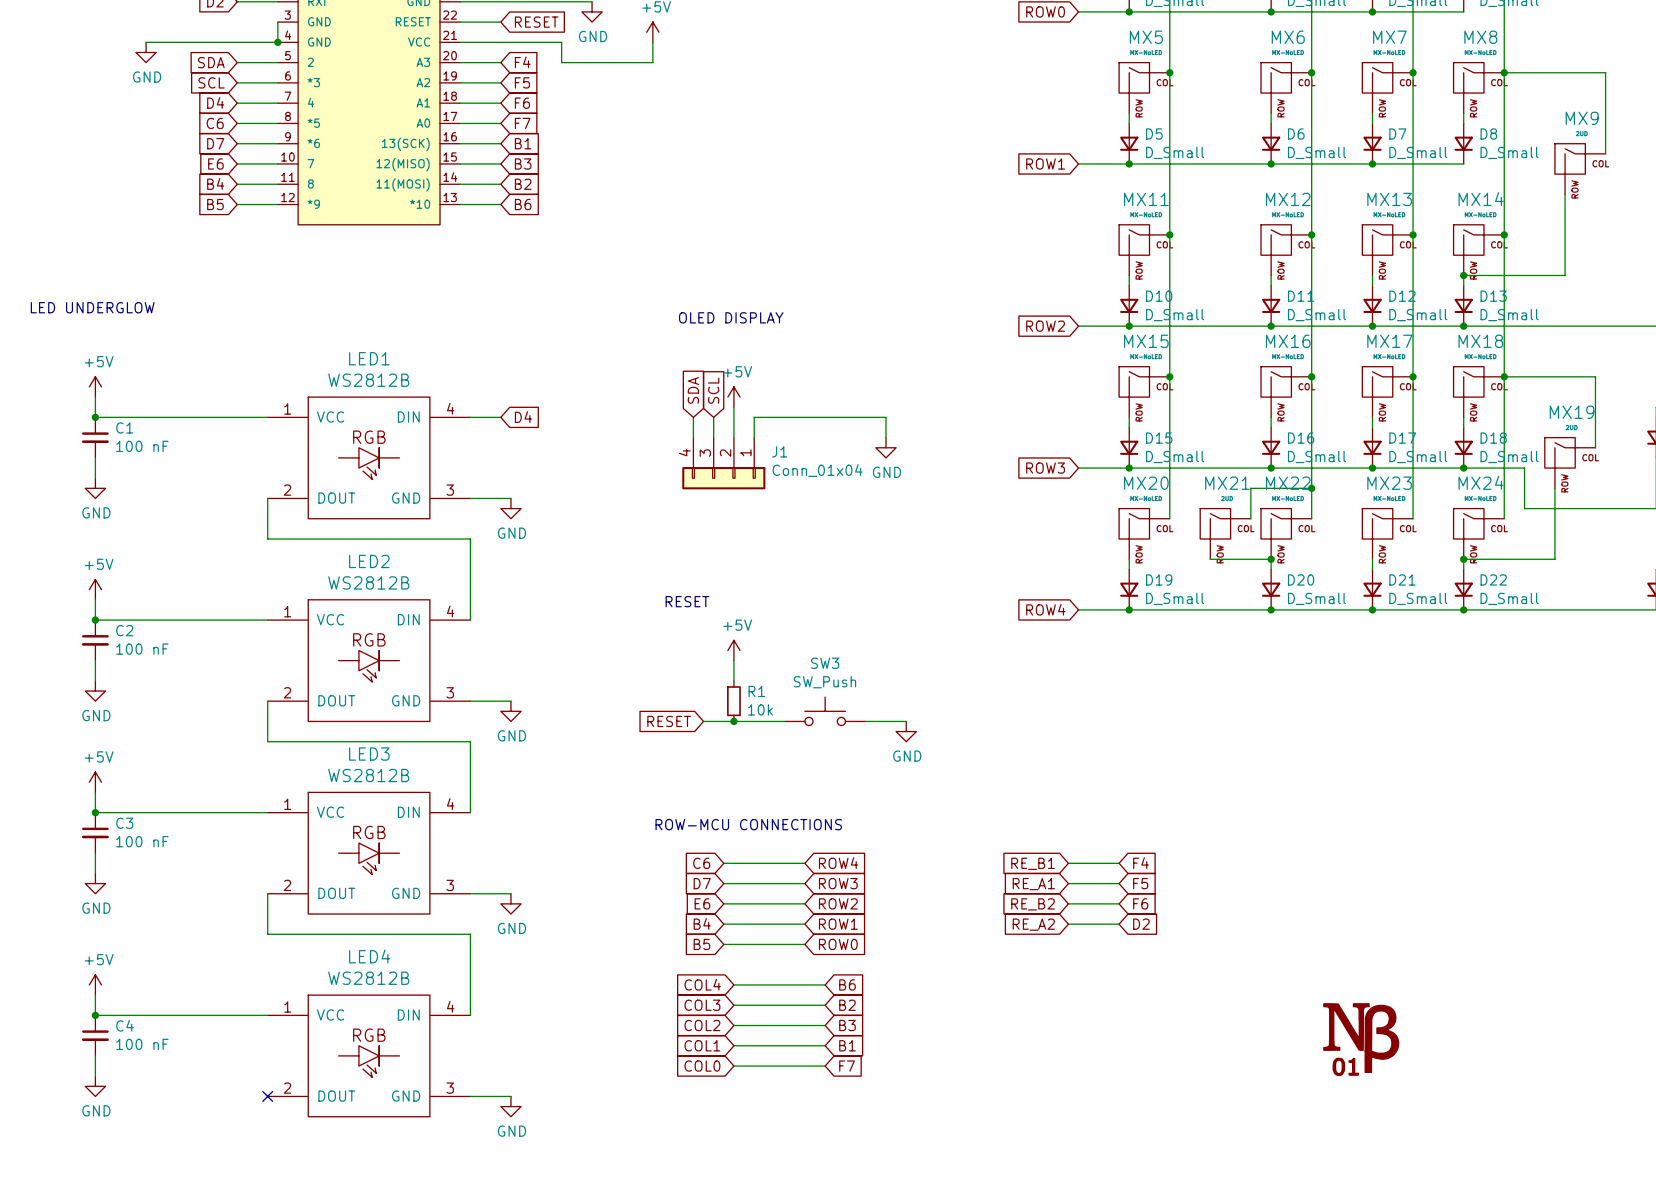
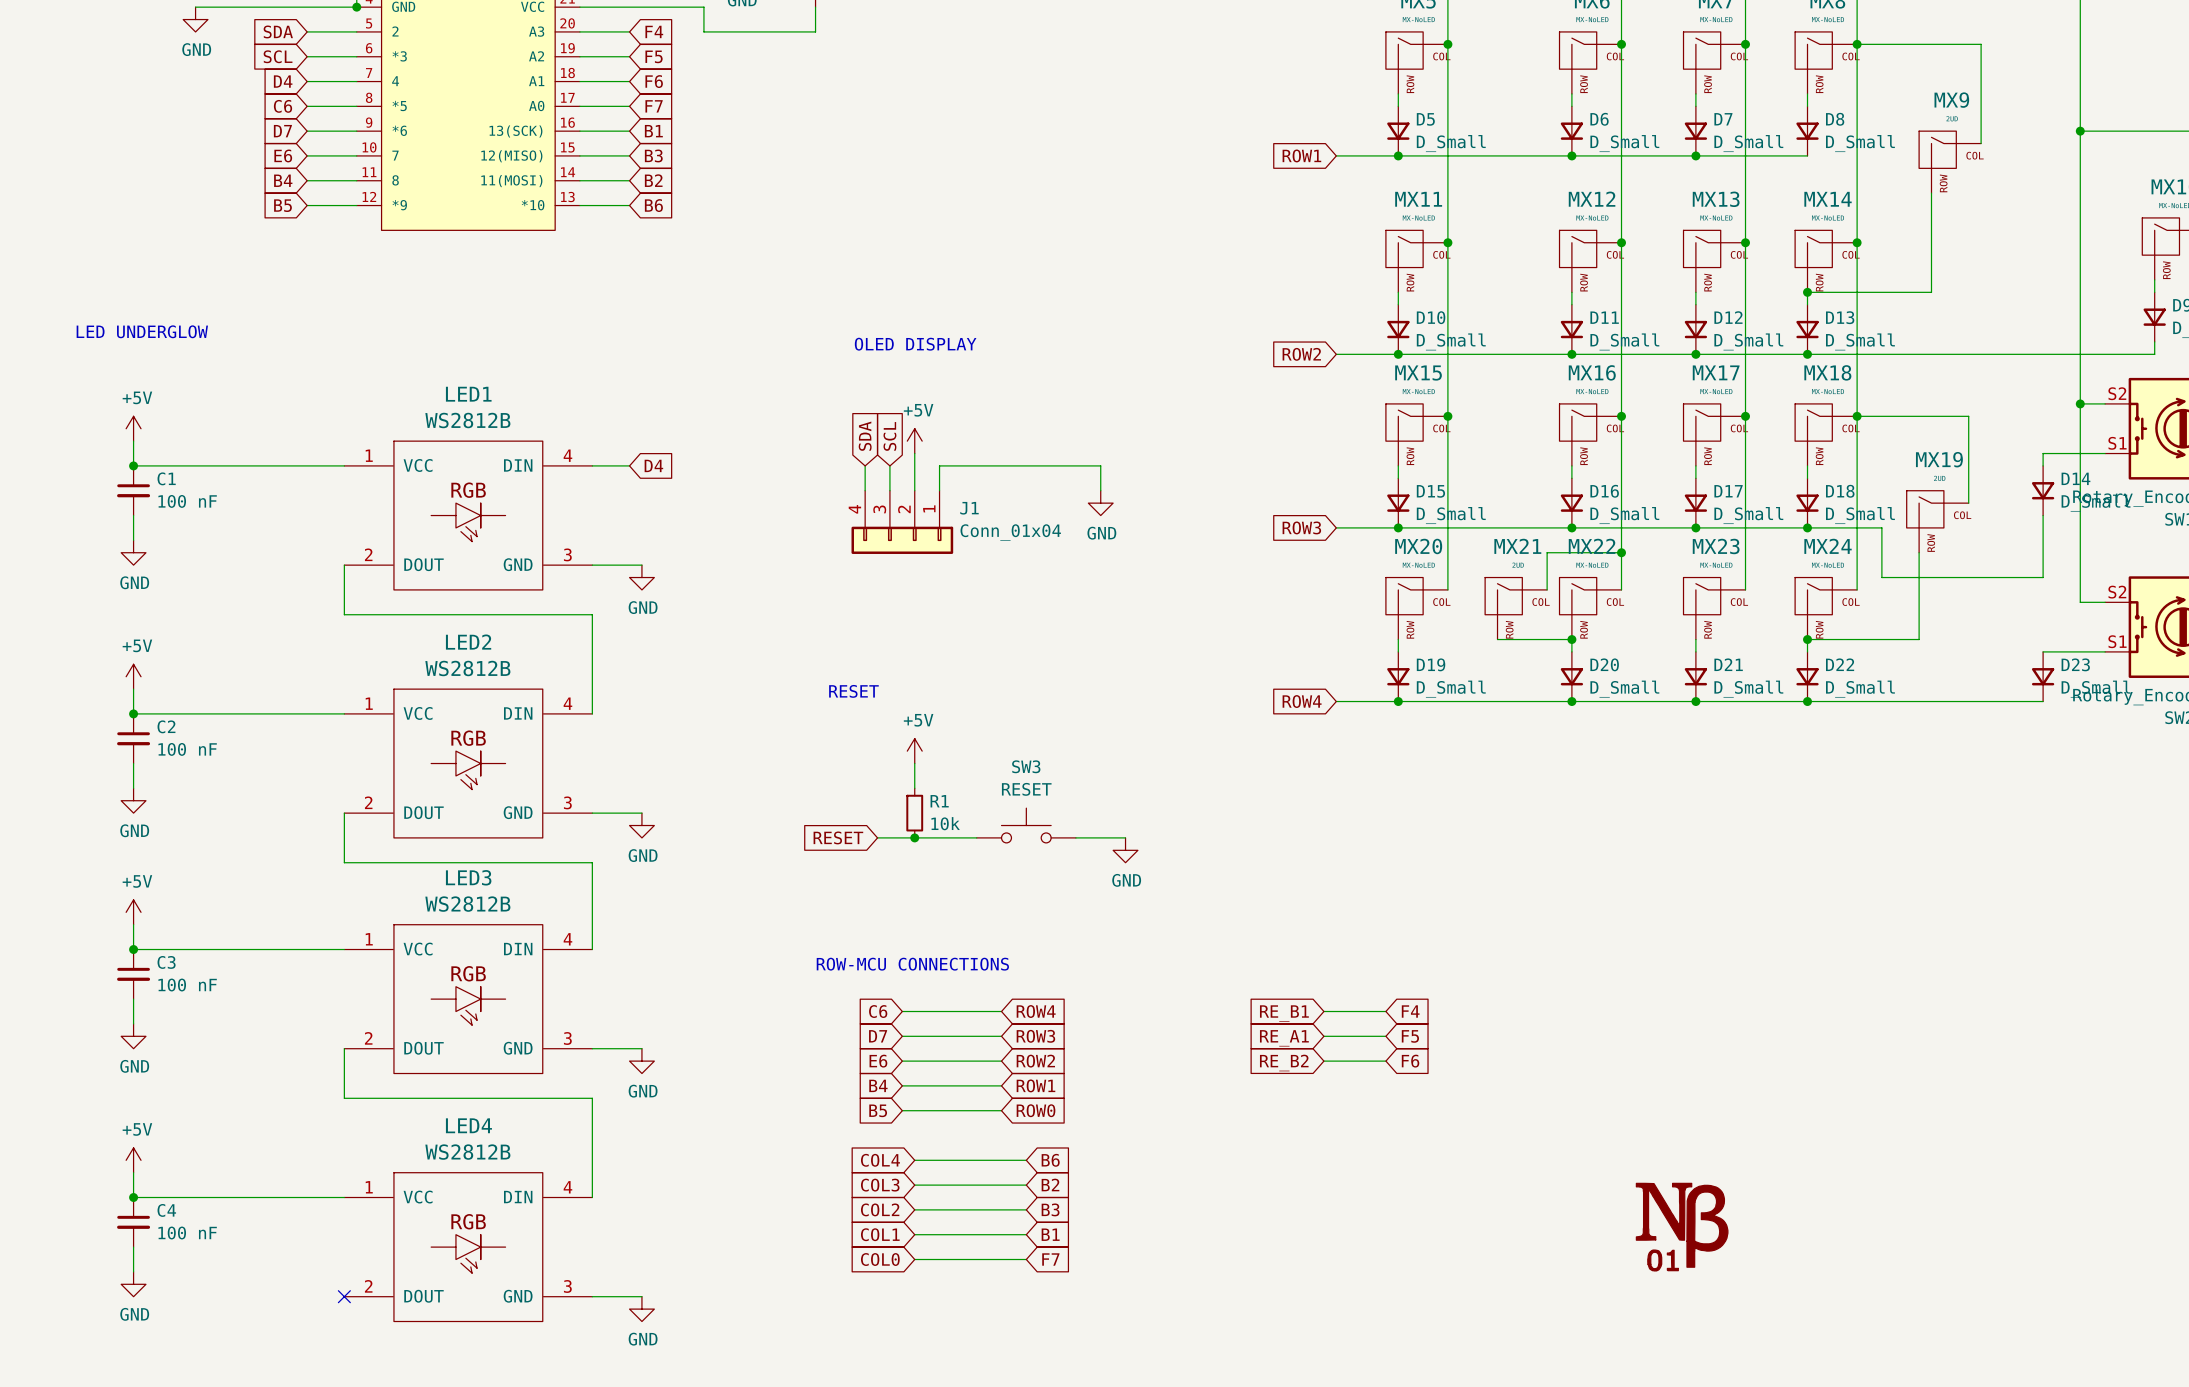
SW3 value: SW_Push (824, 682) -> RESET (1026, 789)
global label: RE_A2 (1033, 924) -> none
wire: (1068, 924) (1119, 924) -> none
global label: D2 (1141, 924) -> none

